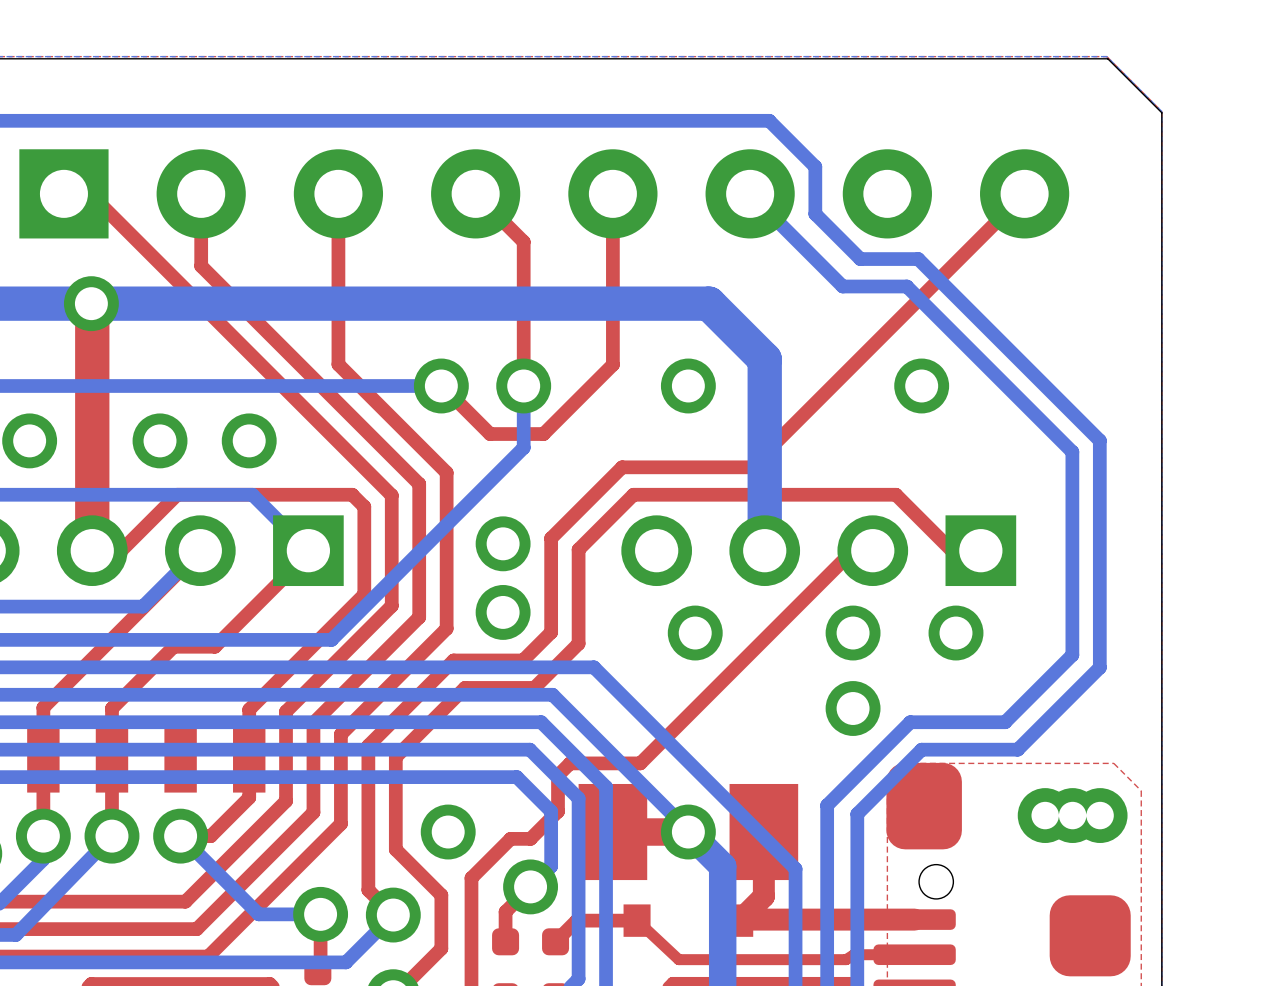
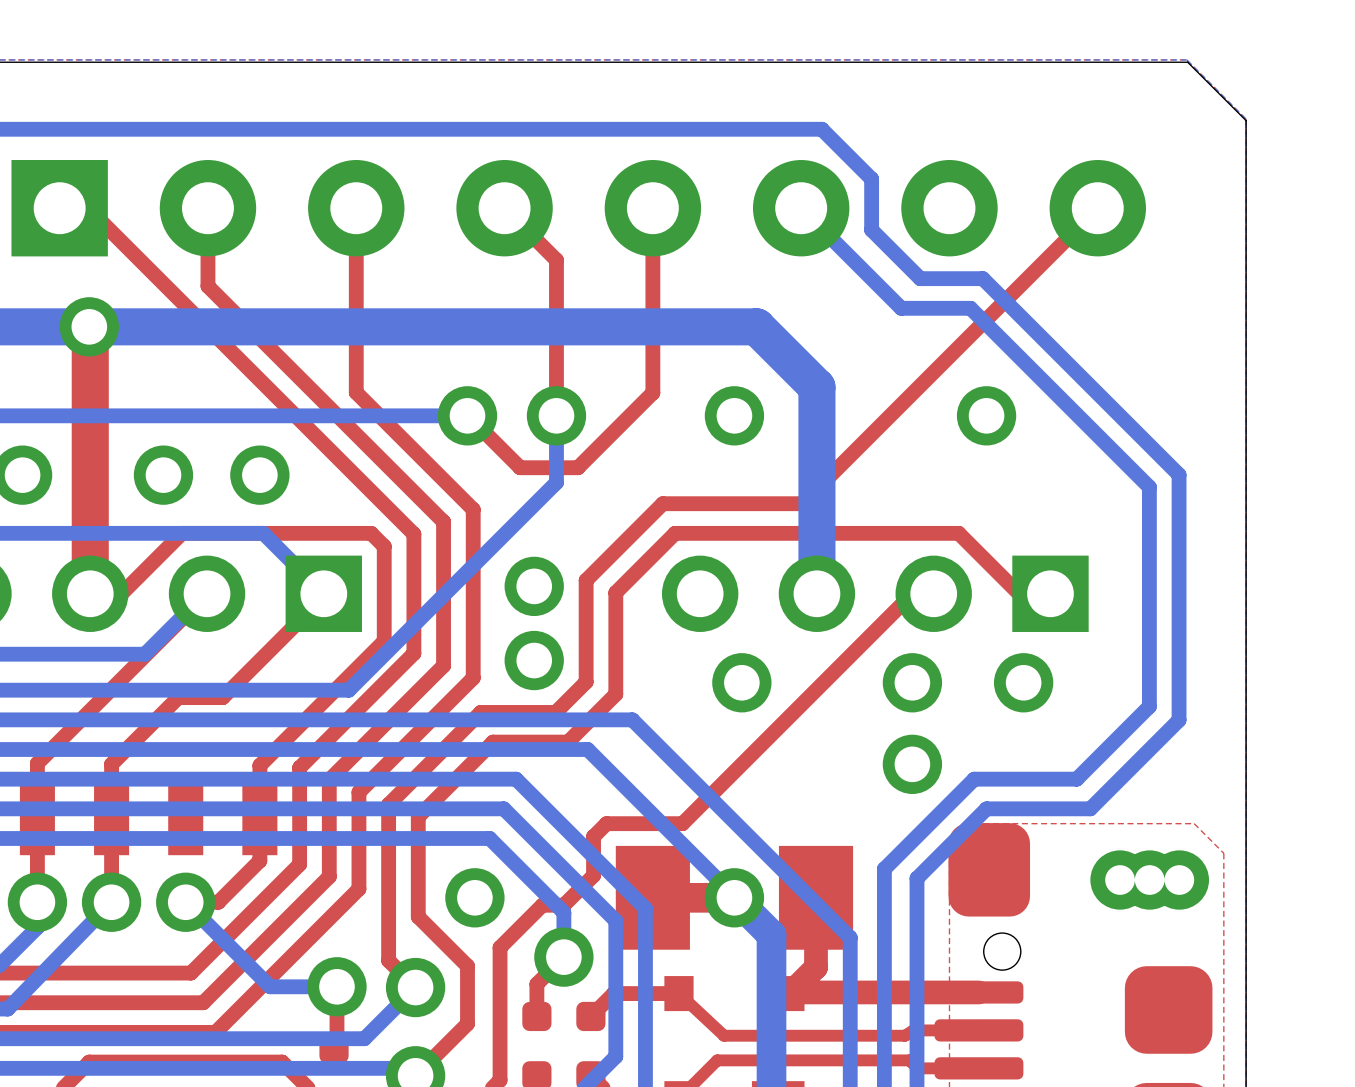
bottom track: (486, 722) (541, 722) (606, 787) (606, 841) -> (516, 779) (645, 908)
bottom track: (474, 749) (529, 749) (578, 798) (578, 853) -> (503, 808) (615, 920)
bottom track: (461, 777) (516, 777) (551, 811) (551, 866) (530, 886) -> (489, 838) (563, 912) (563, 957)

